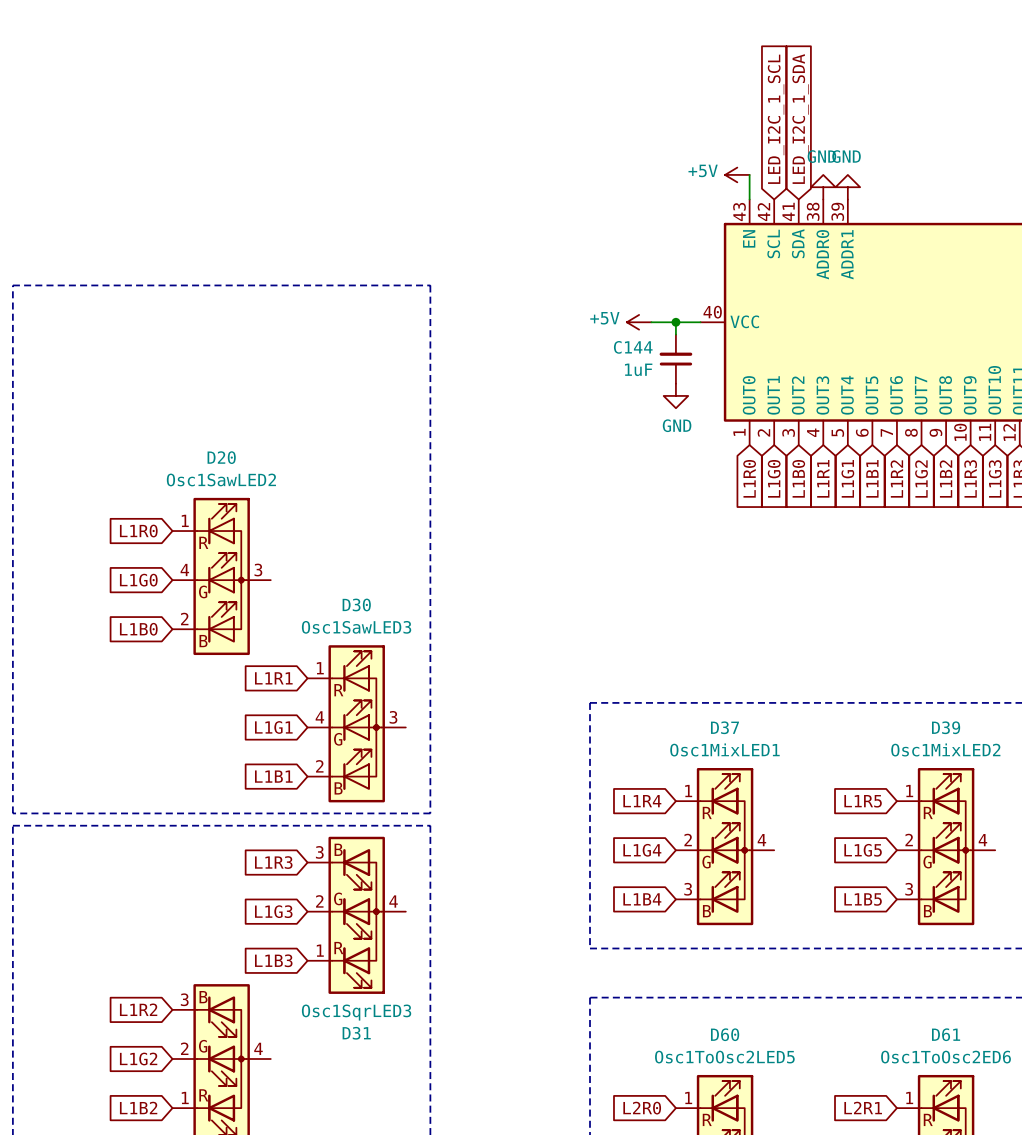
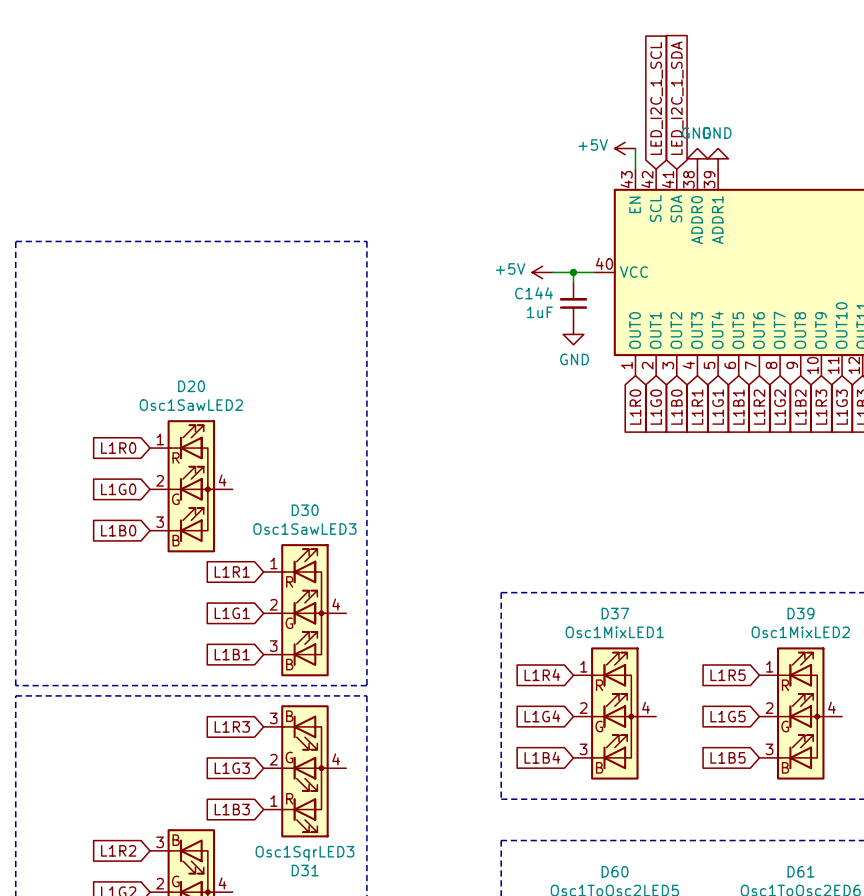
D20 symbol: [172, 497, 271, 656] -> [150, 420, 233, 553]
D30 symbol: [307, 645, 406, 803] -> [263, 544, 347, 677]

